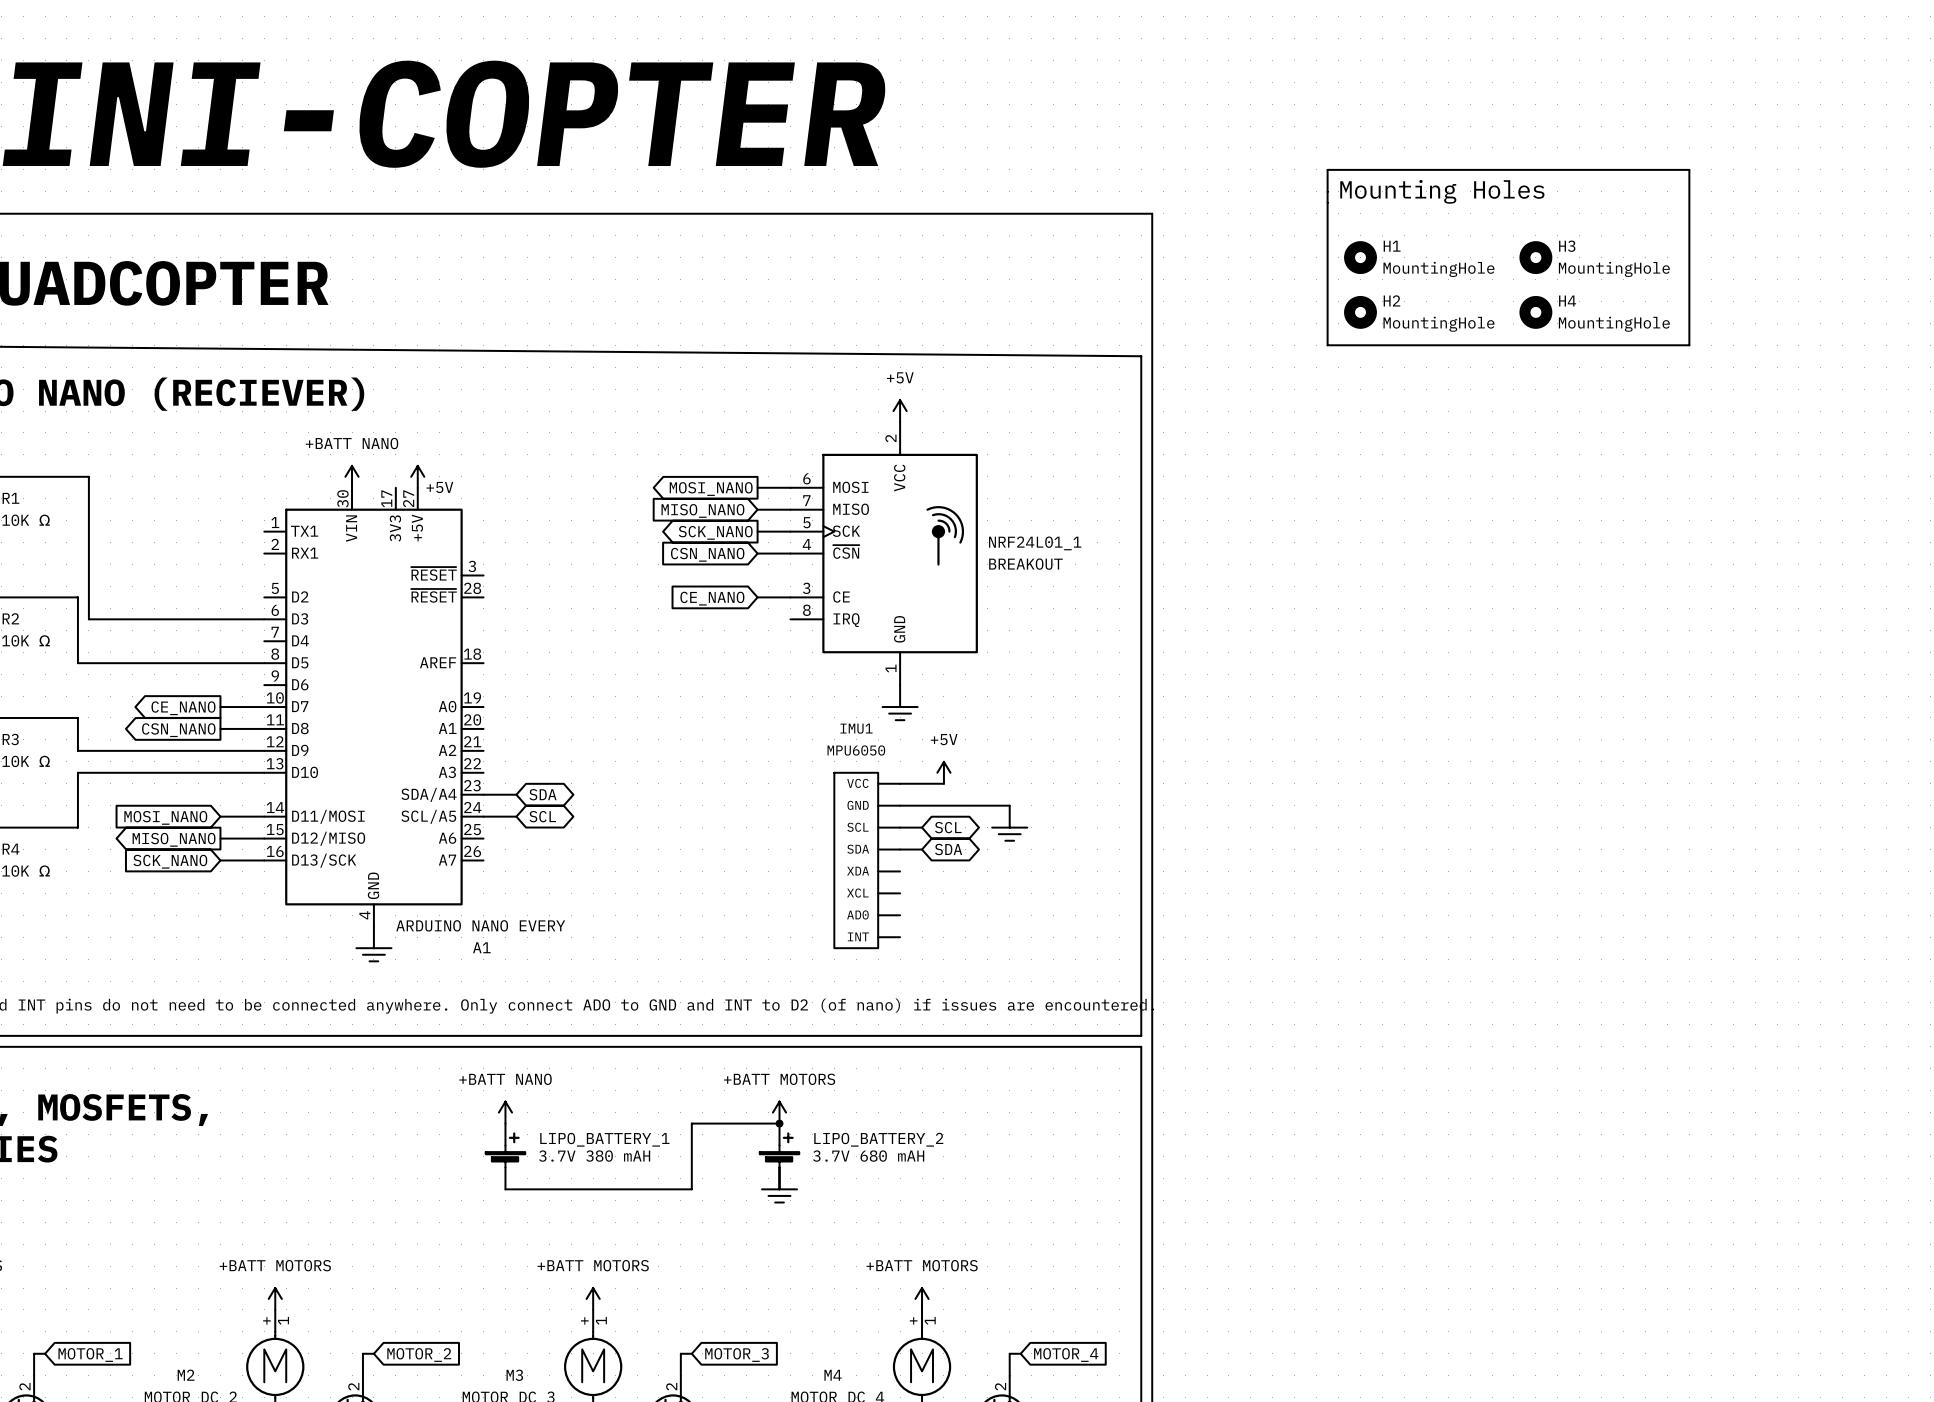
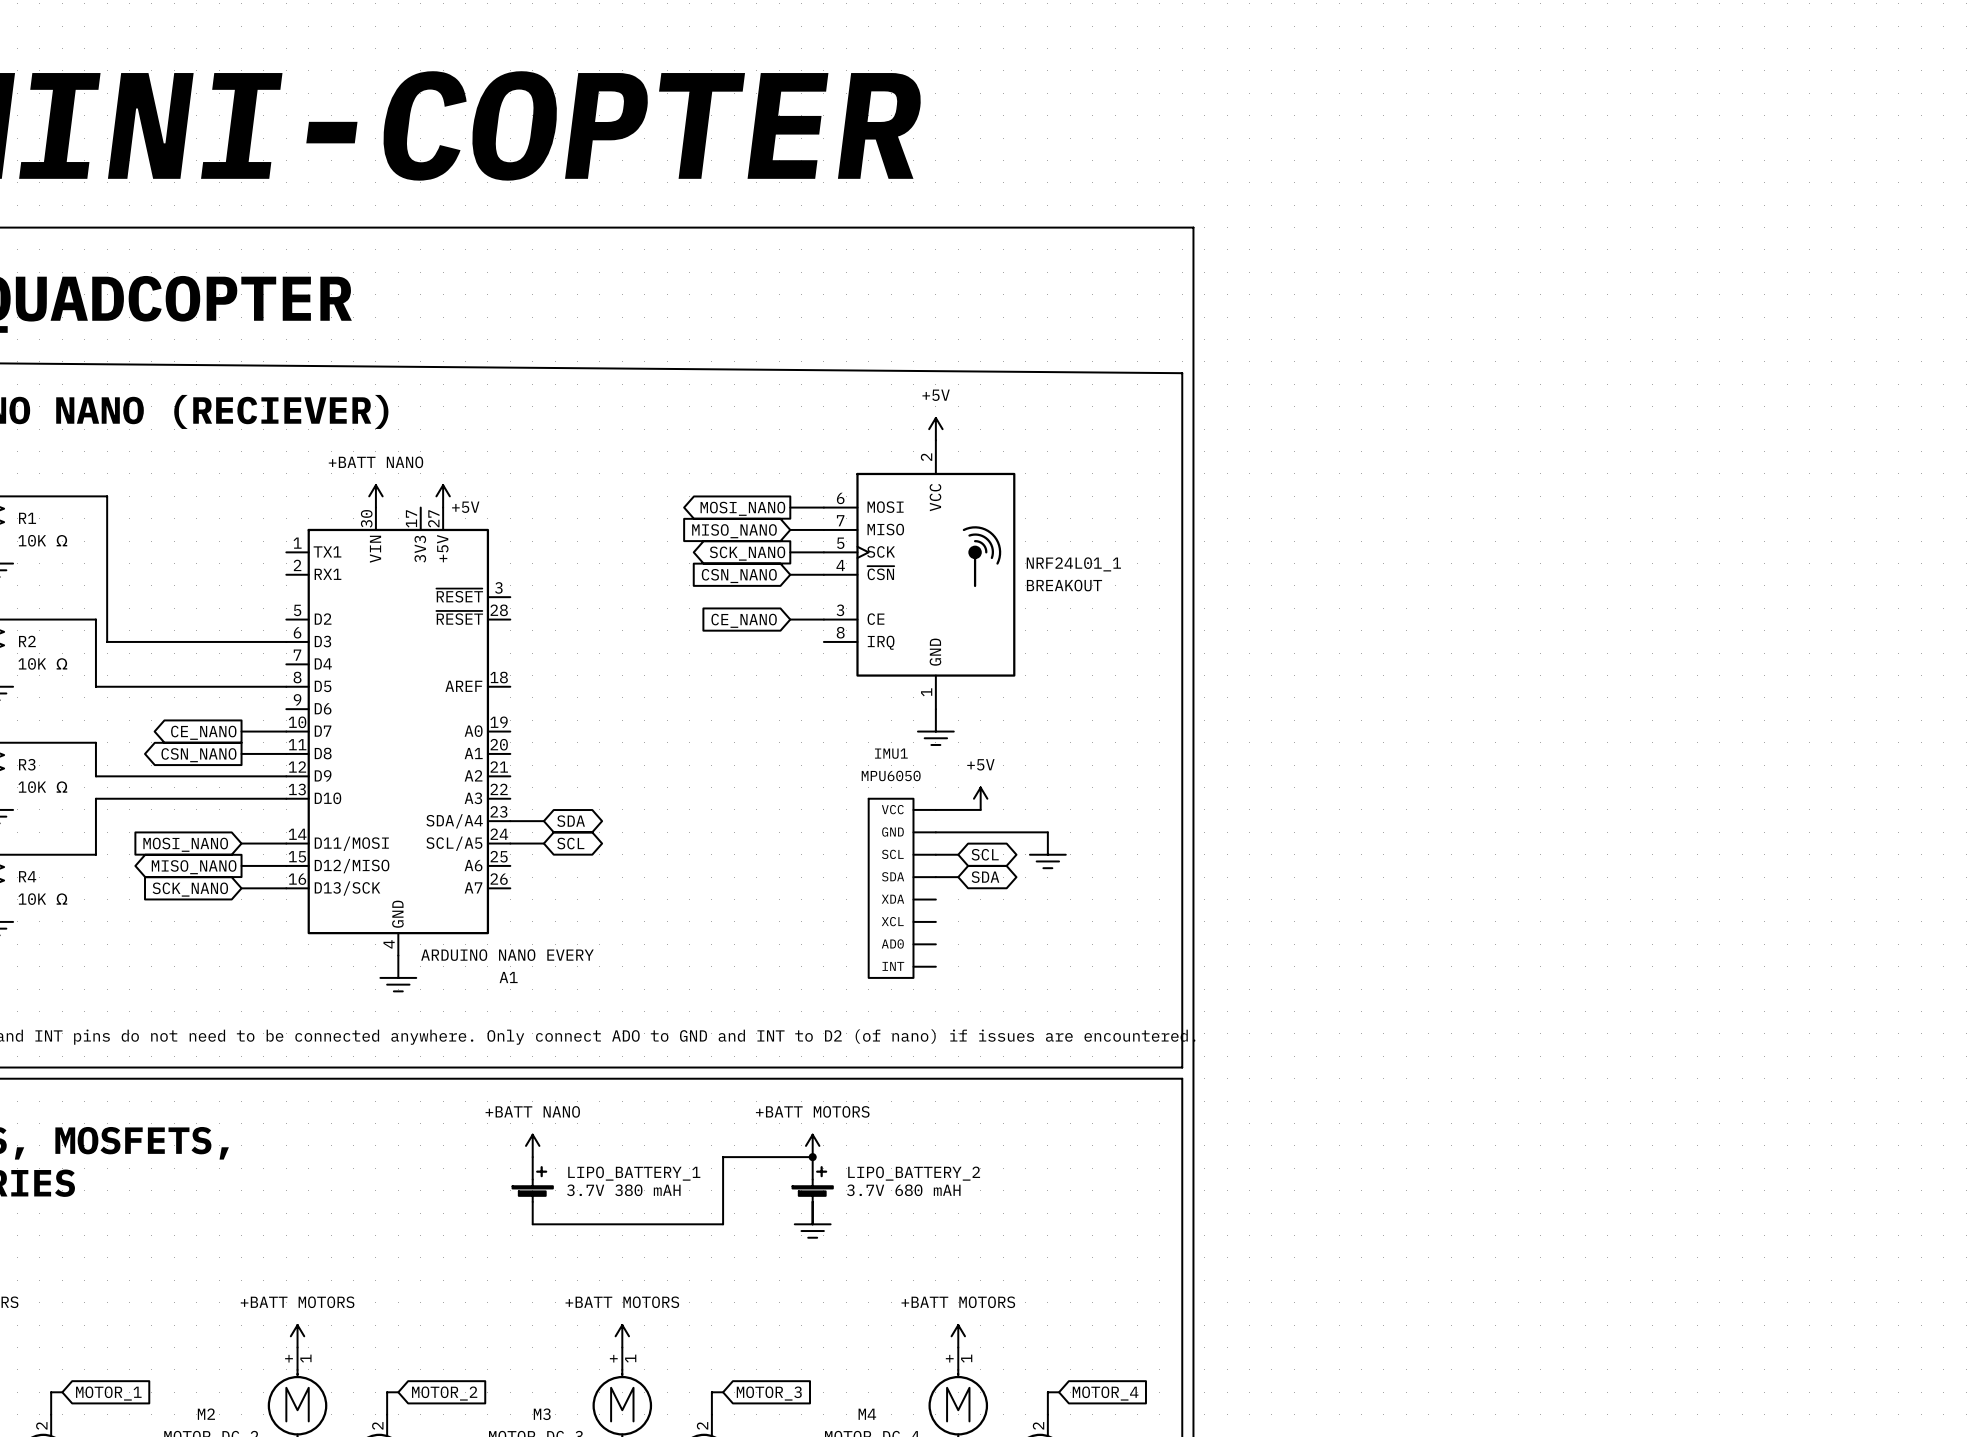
line: (1327, 169) (1327, 345) (1689, 345) (1689, 169) (1327, 169) -> none
text: Mounting Holes (1442, 191) -> none
H1: MountingHole (1360, 257) -> none
H3: MountingHole (1535, 257) -> none
H2: MountingHole (1360, 312) -> none
H4: MountingHole (1535, 312) -> none

